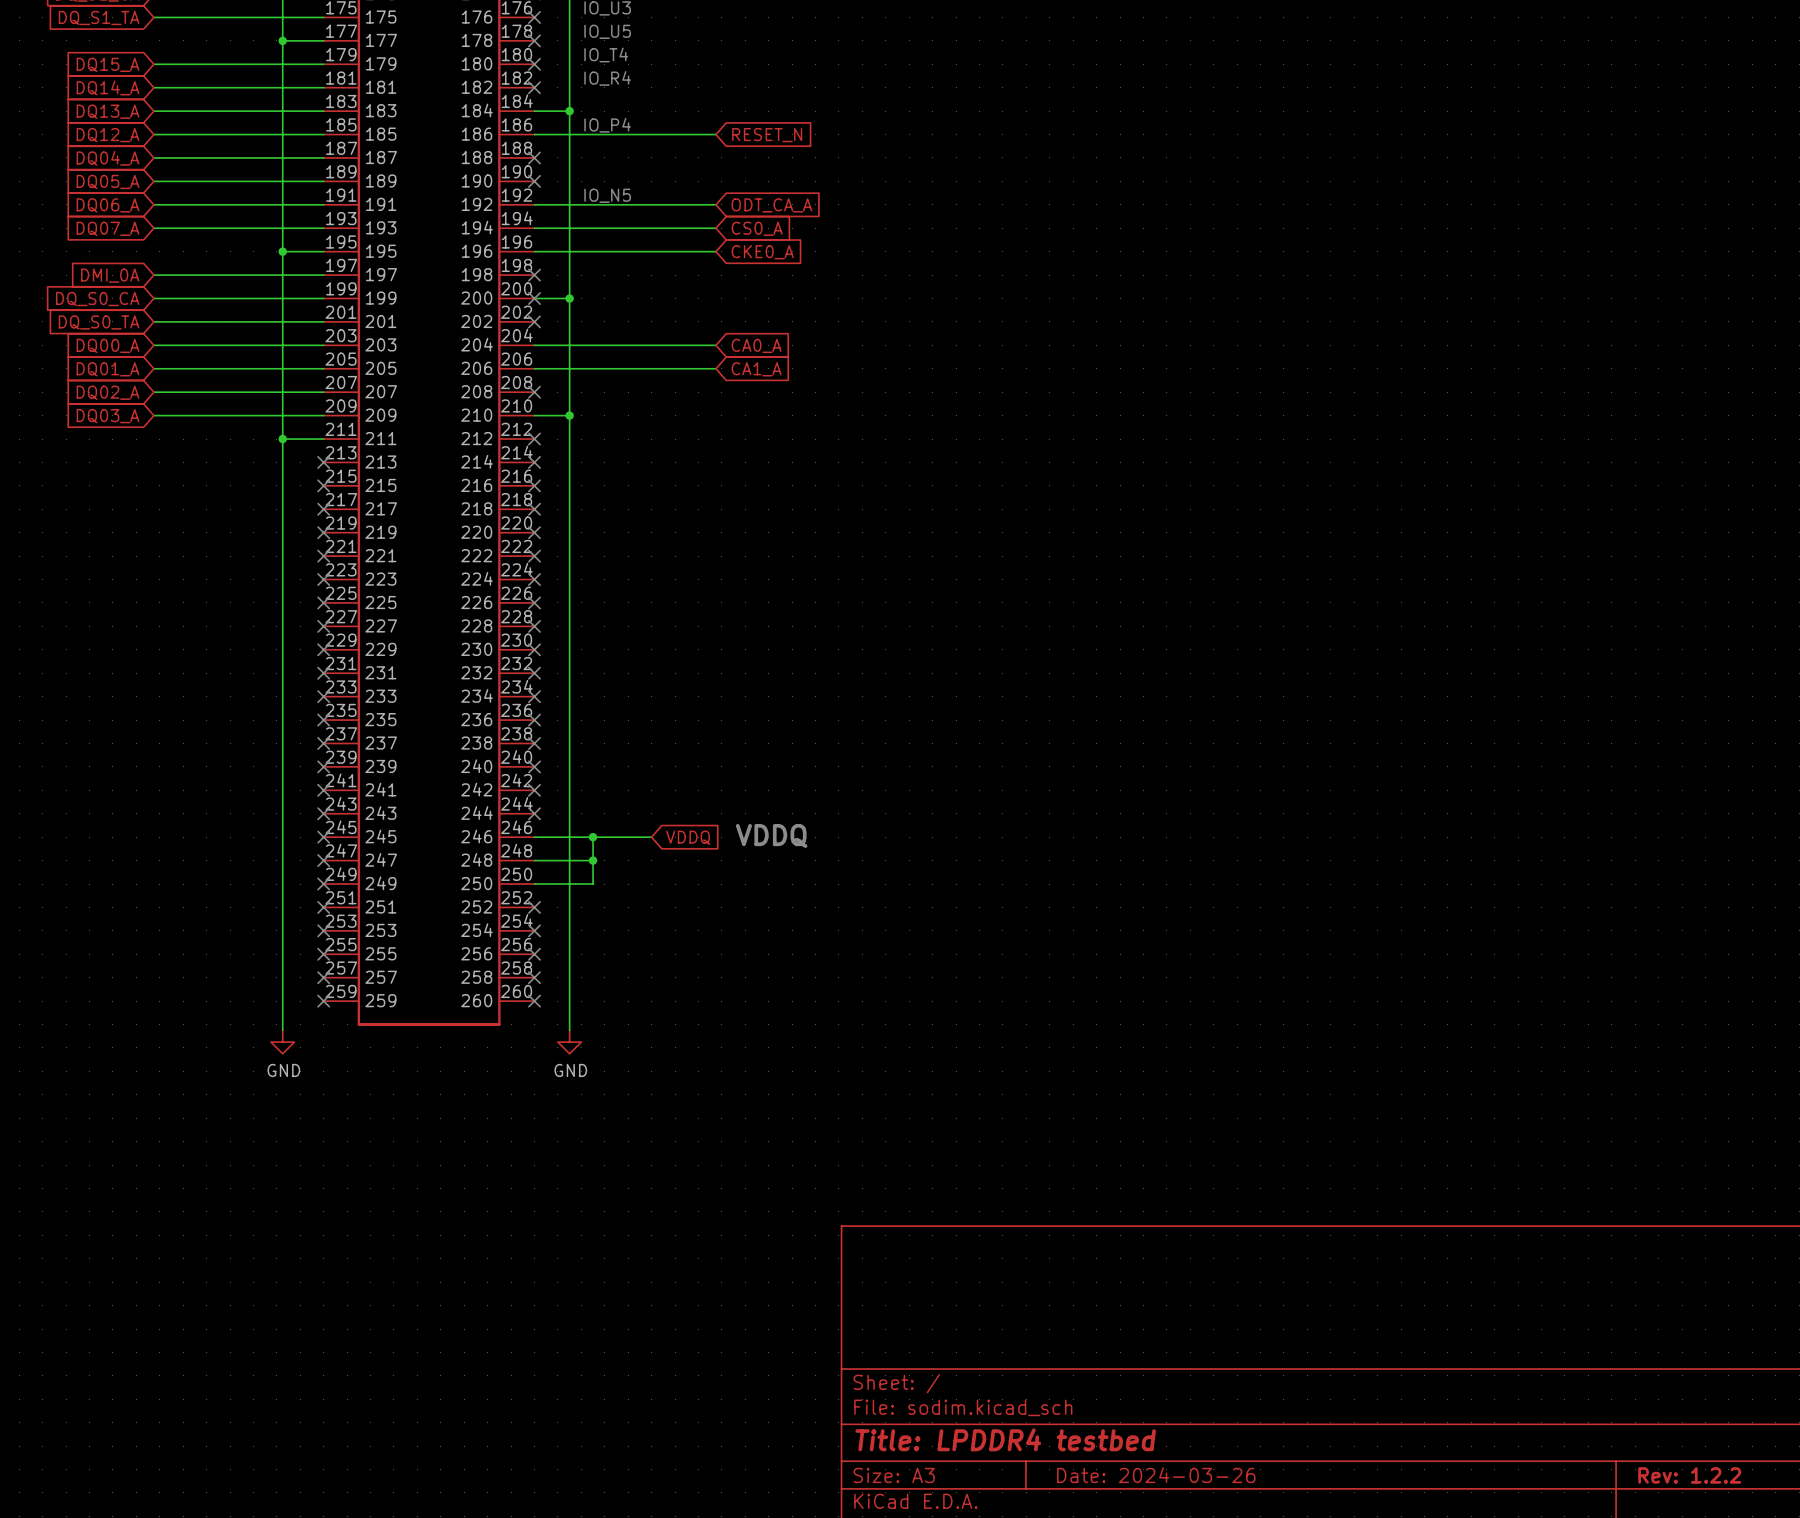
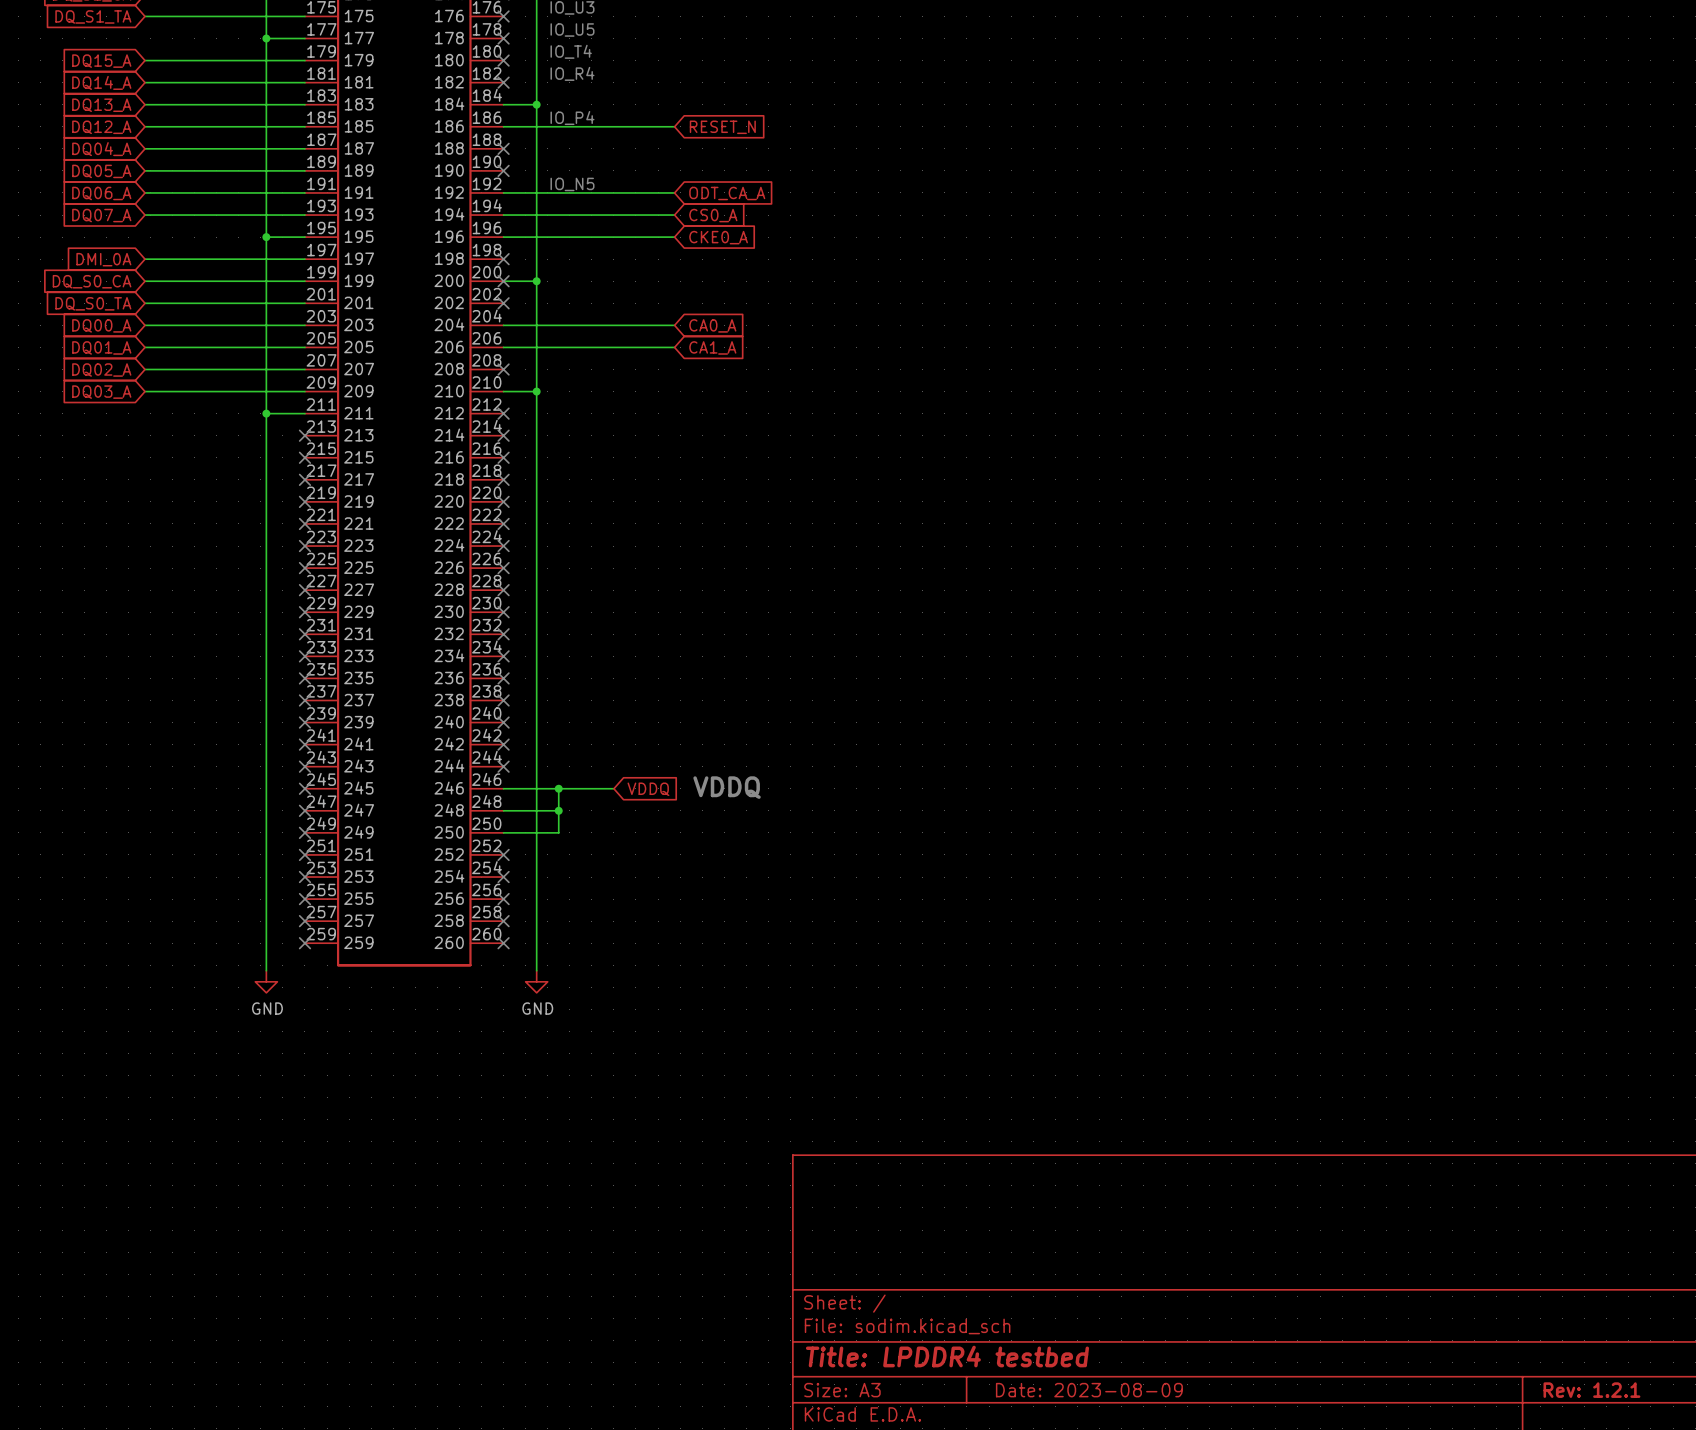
title block: Date: 2024-03-26 (1156, 1475) -> Date: 2023-08-09 (1089, 1390)
title block: Rev: 1.2.2 (1689, 1475) -> Rev: 1.2.1 (1591, 1390)

